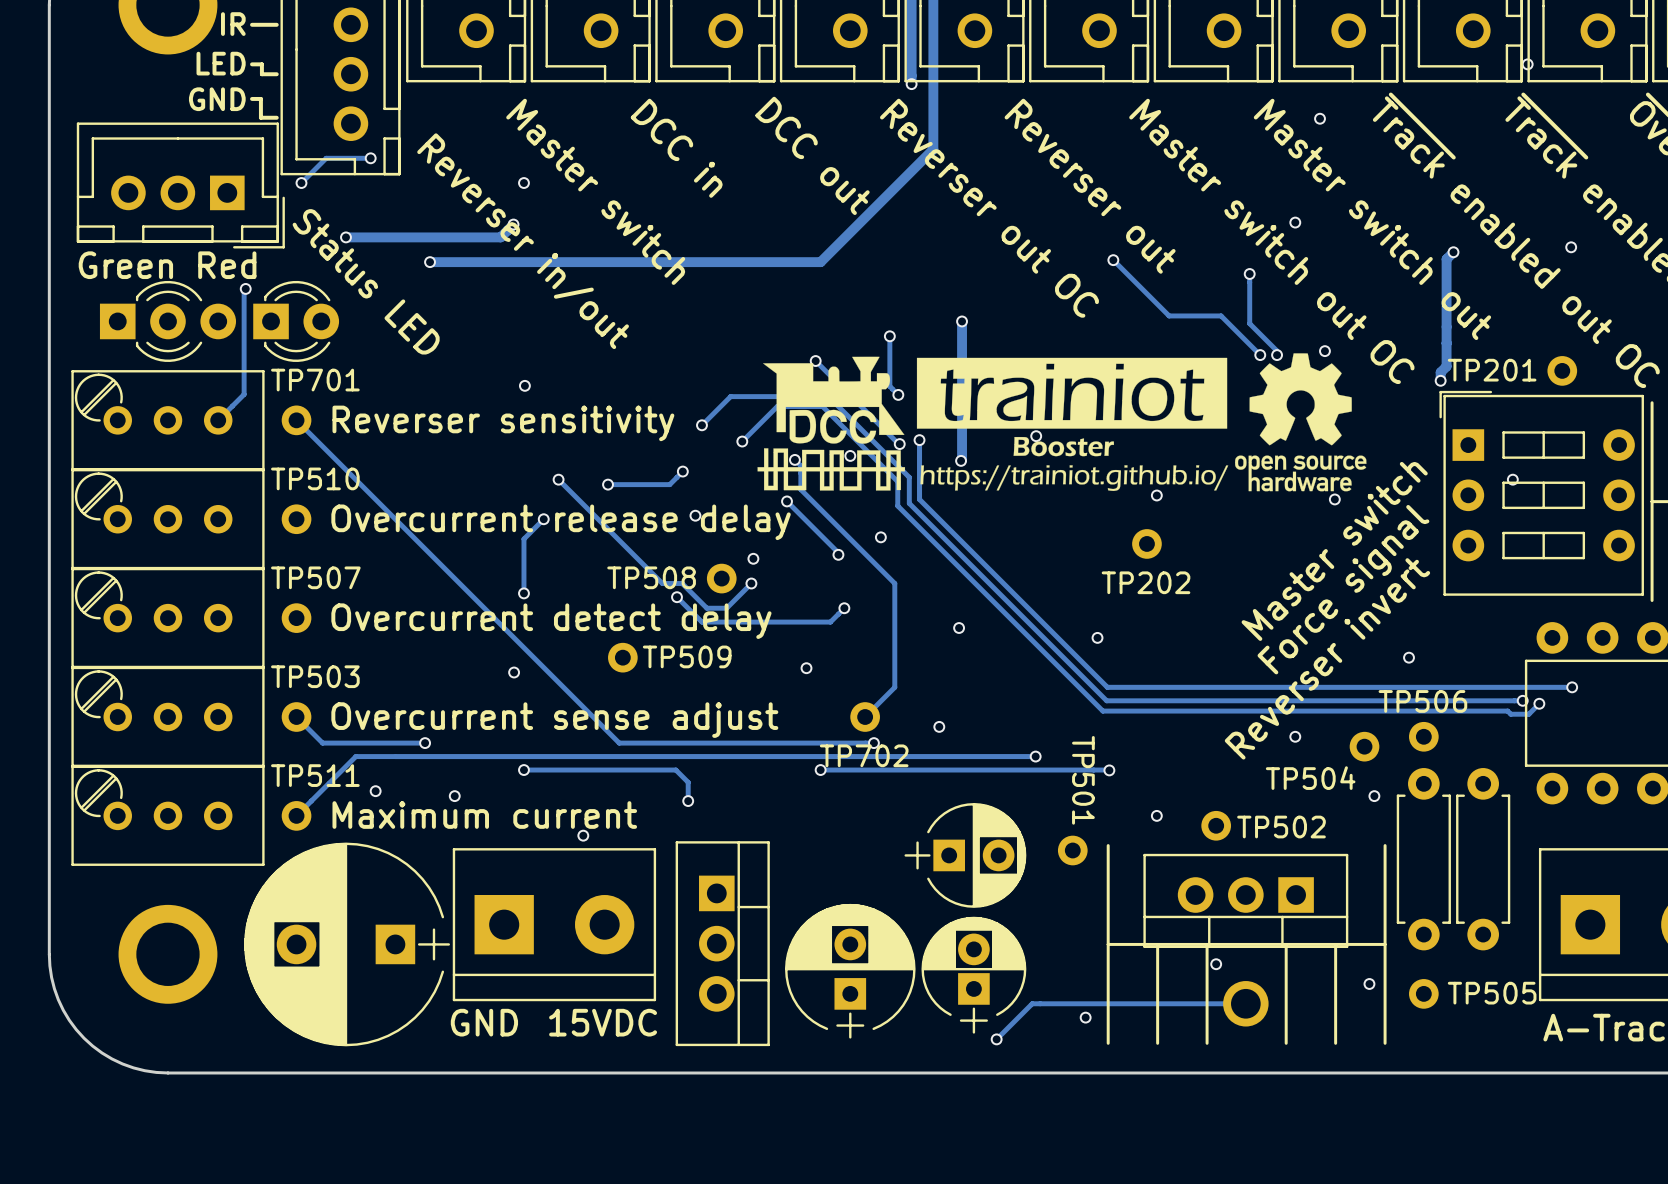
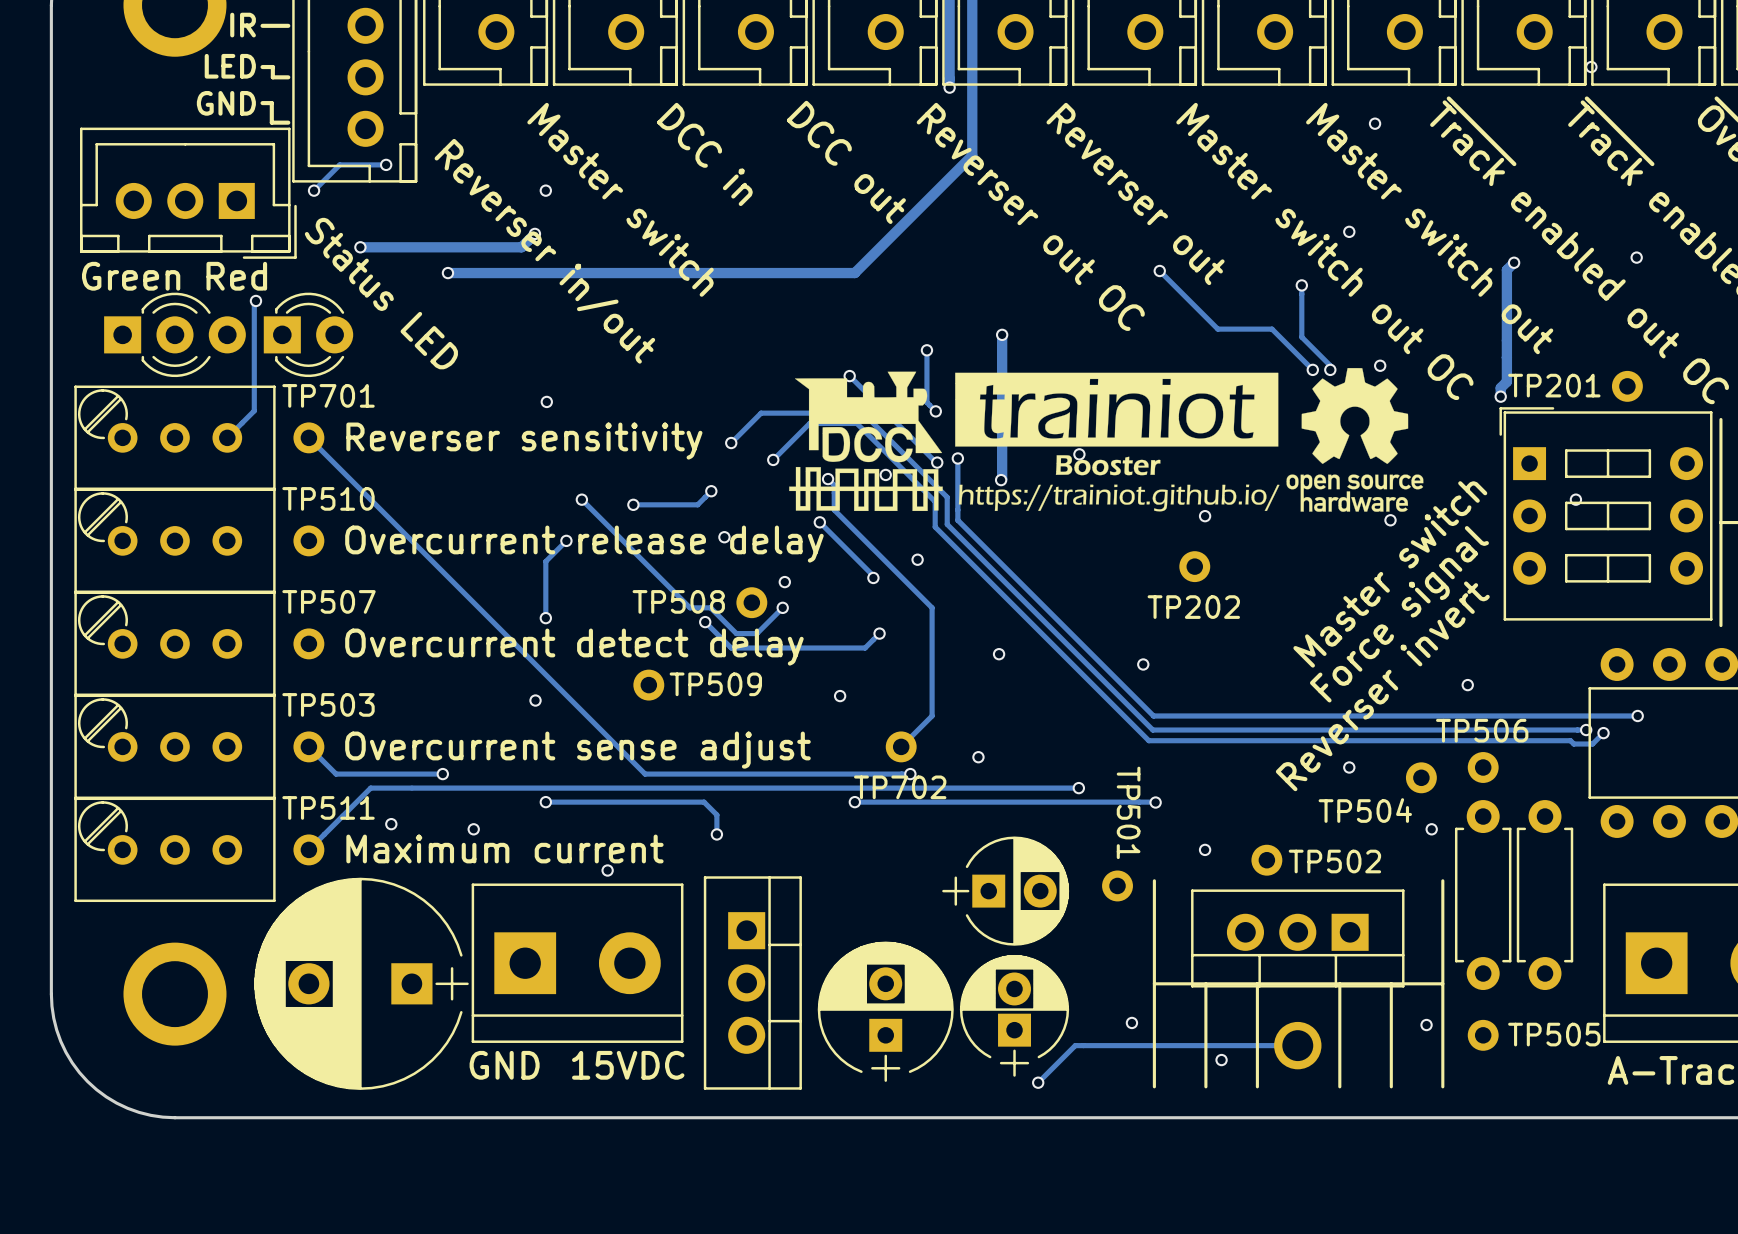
via: (1216, 964) -> none
via position: (1085, 1017) -> (1131, 1022)
via: none -> (1221, 1060)

